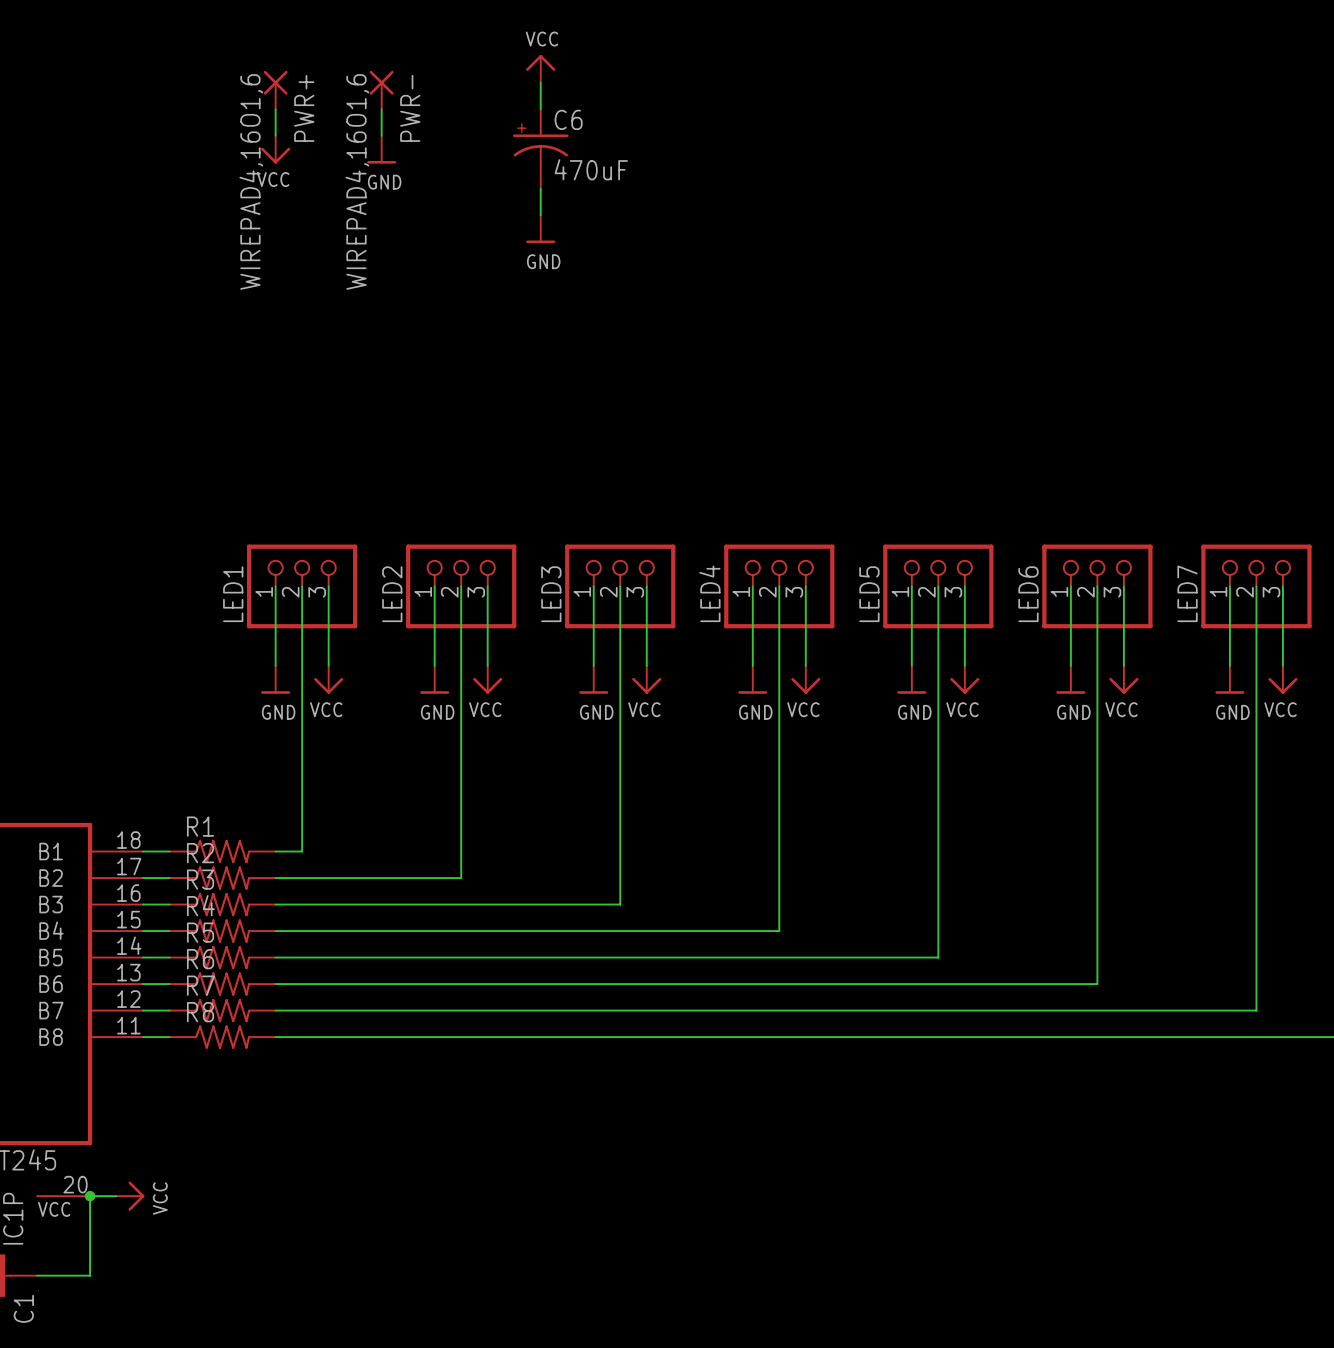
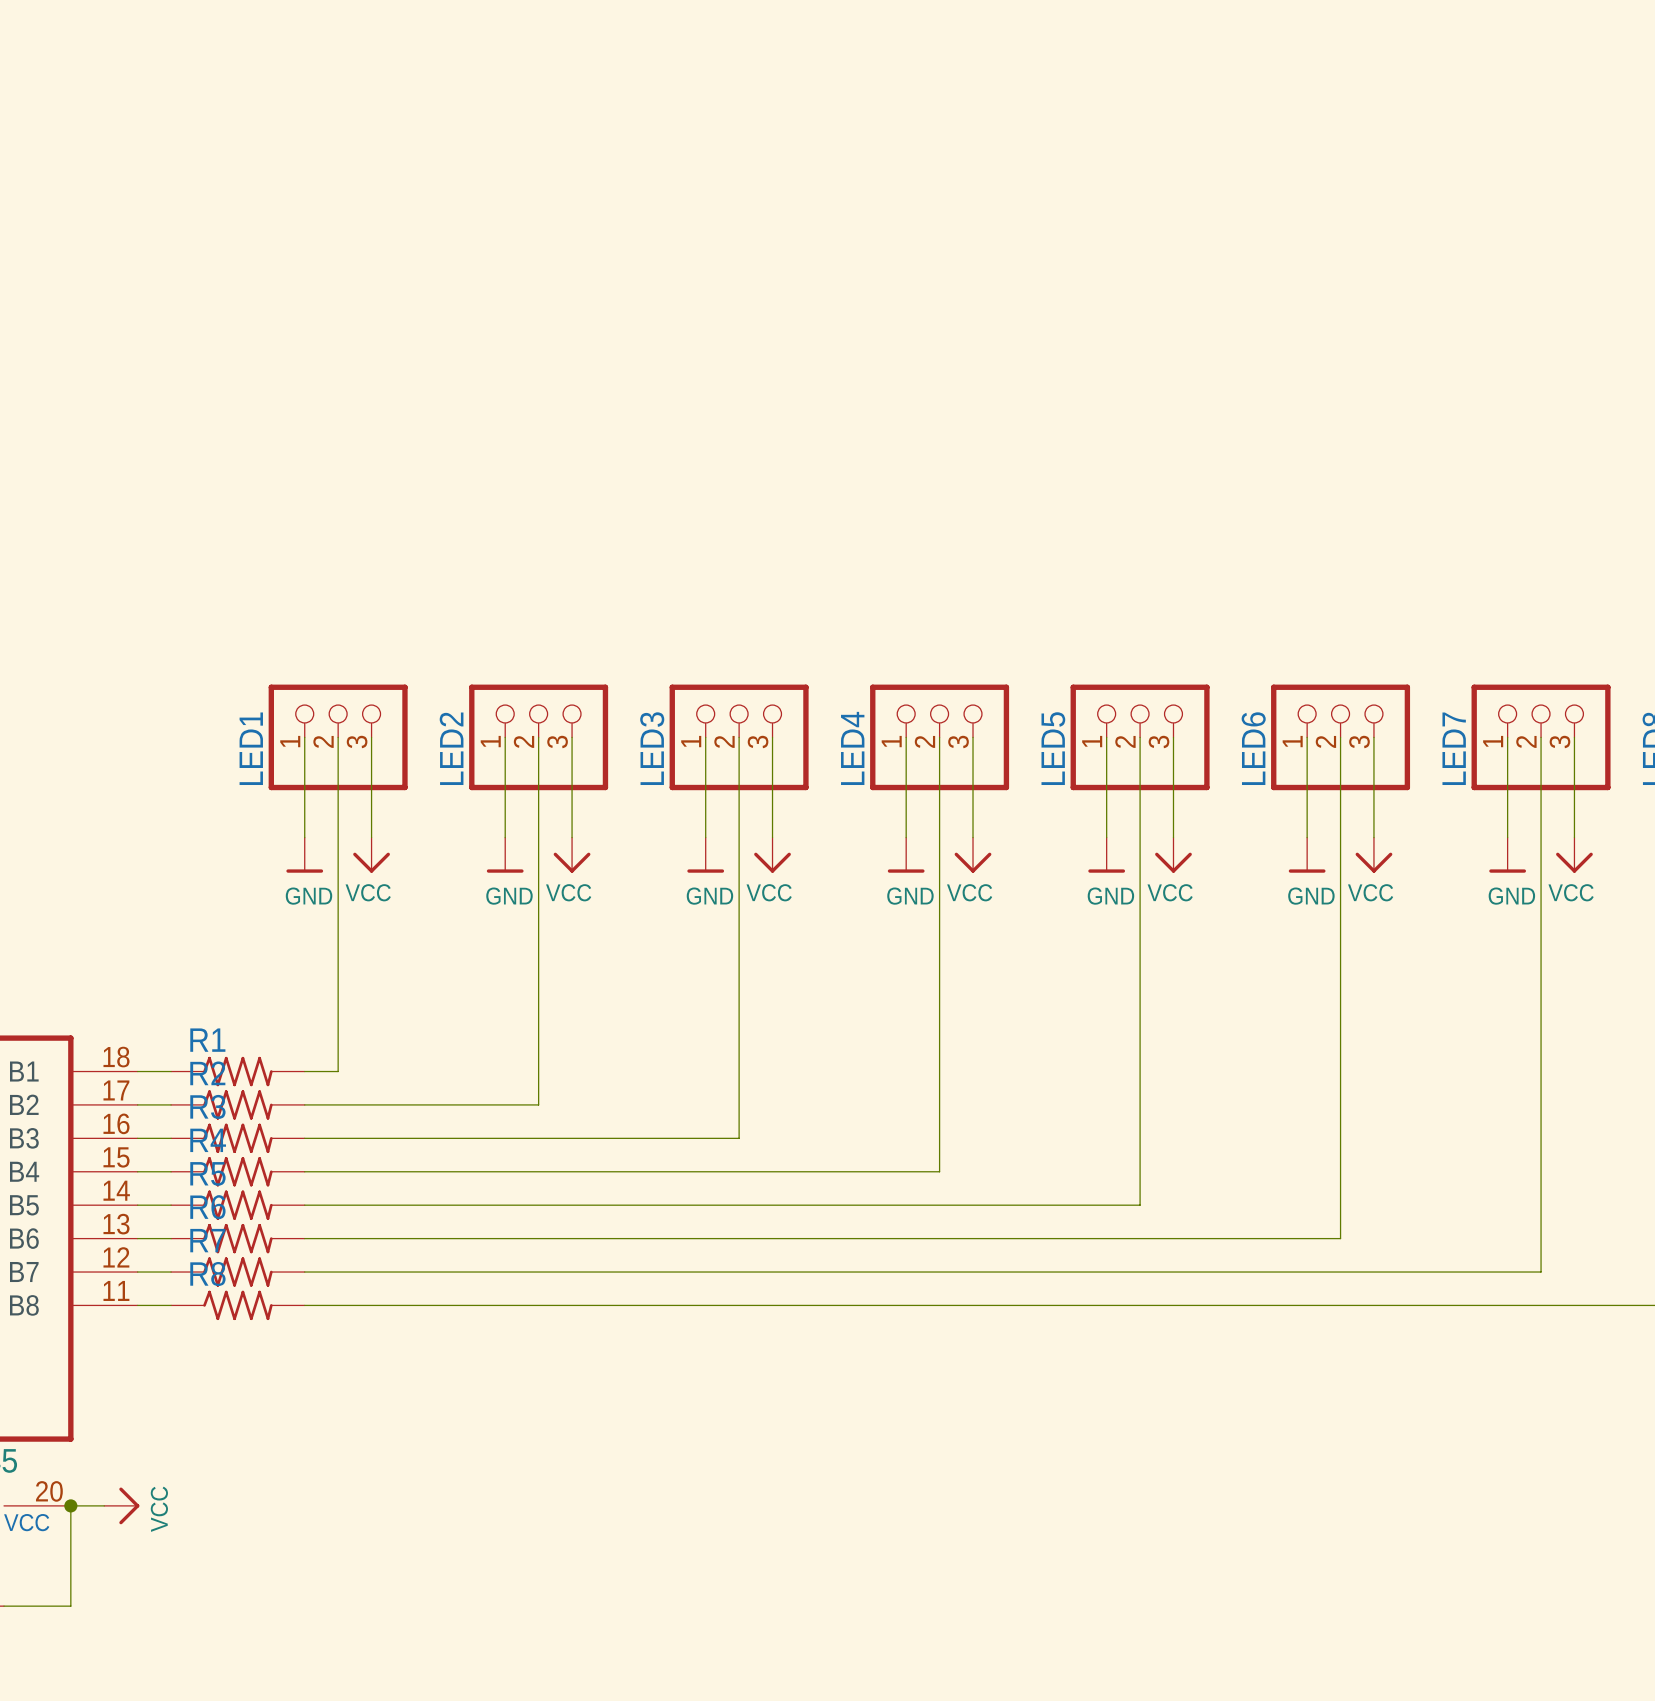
power symbol: VCC (540, 68) -> none
wire: (540, 82) (540, 109) -> none
PWR+: WIREPAD4,16O1,6 (275, 90) -> none
PWR-: WIREPAD4,16O1,6 (381, 90) -> none
wire: (275, 109) (275, 135) -> none
wire: (381, 109) (381, 135) -> none
power symbol: VCC (275, 149) -> none
power symbol: GND (381, 149) -> none
C6: 470uF (540, 149) -> none
wire: (540, 188) (540, 215) -> none
power symbol: GND (540, 229) -> none

